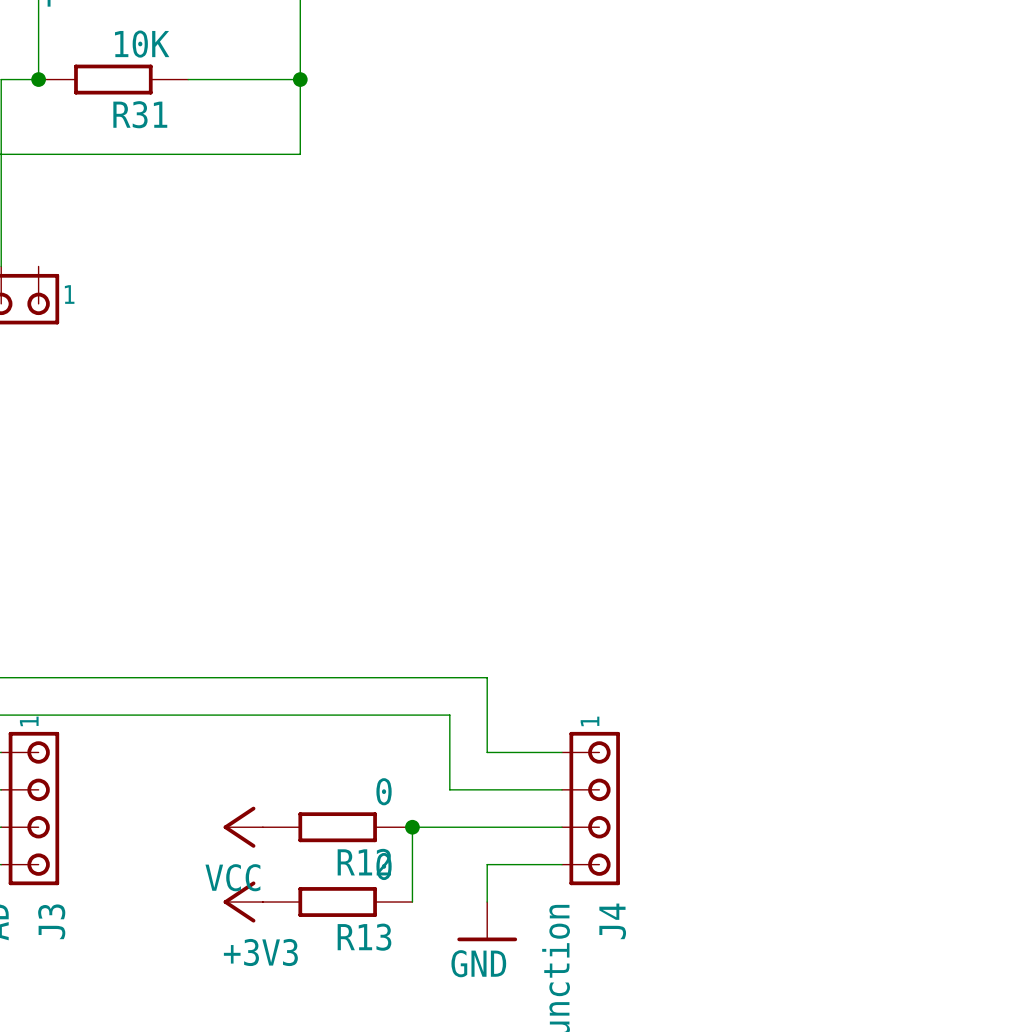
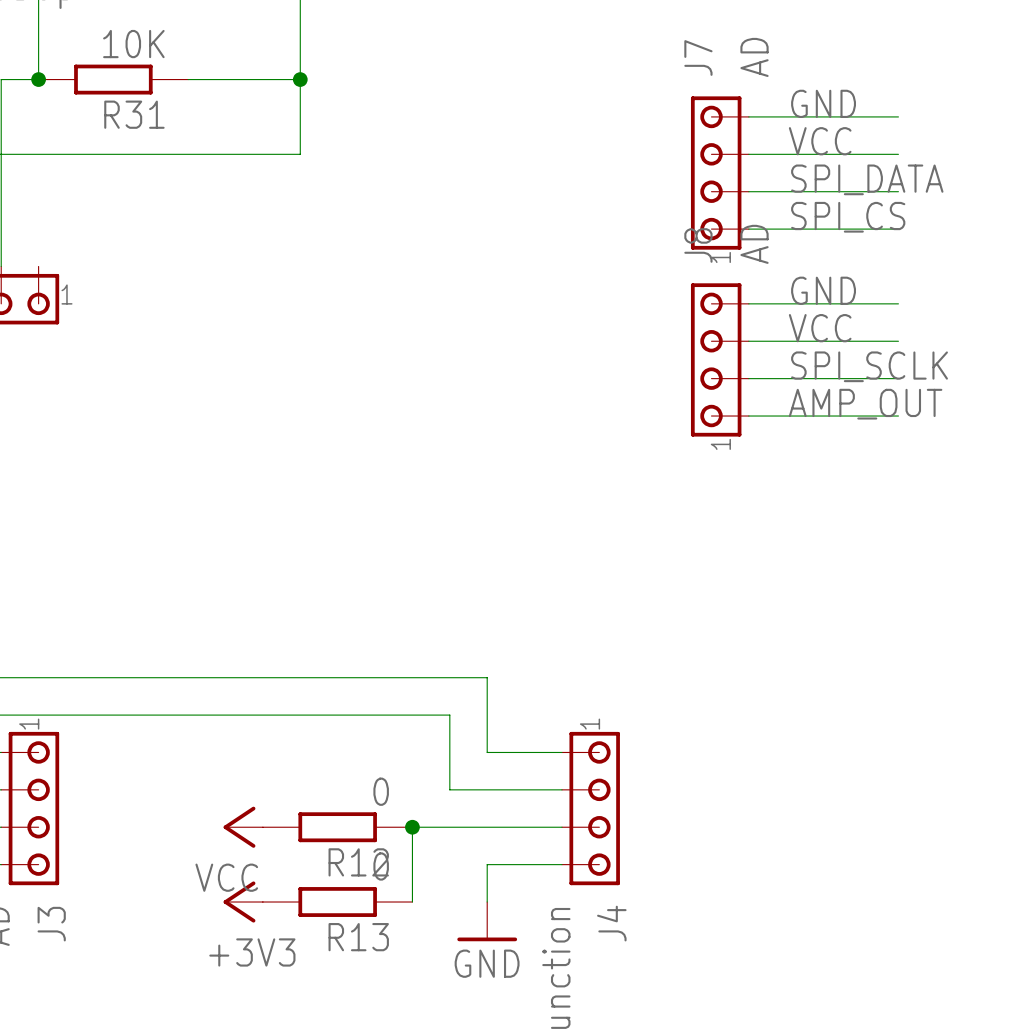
label: none -> GND (823, 103)
wire: none -> (748, 116) (898, 116)
label: none -> VCC (820, 141)
wire: none -> (748, 154) (898, 154)
J7: none -> AD (719, 173)
label: none -> SPI_DATA (867, 179)
wire: none -> (748, 191) (898, 191)
label: none -> SPI_CS (848, 217)
wire: none -> (748, 229) (898, 229)
label: none -> GND (823, 290)
wire: none -> (748, 303) (898, 303)
label: none -> VCC (820, 328)
wire: none -> (748, 341) (898, 341)
J8: none -> AD (719, 359)
label: none -> SPI_SCLK (869, 366)
wire: none -> (748, 378) (898, 378)
label: none -> AMP_OUT (865, 404)
wire: none -> (748, 416) (898, 416)

